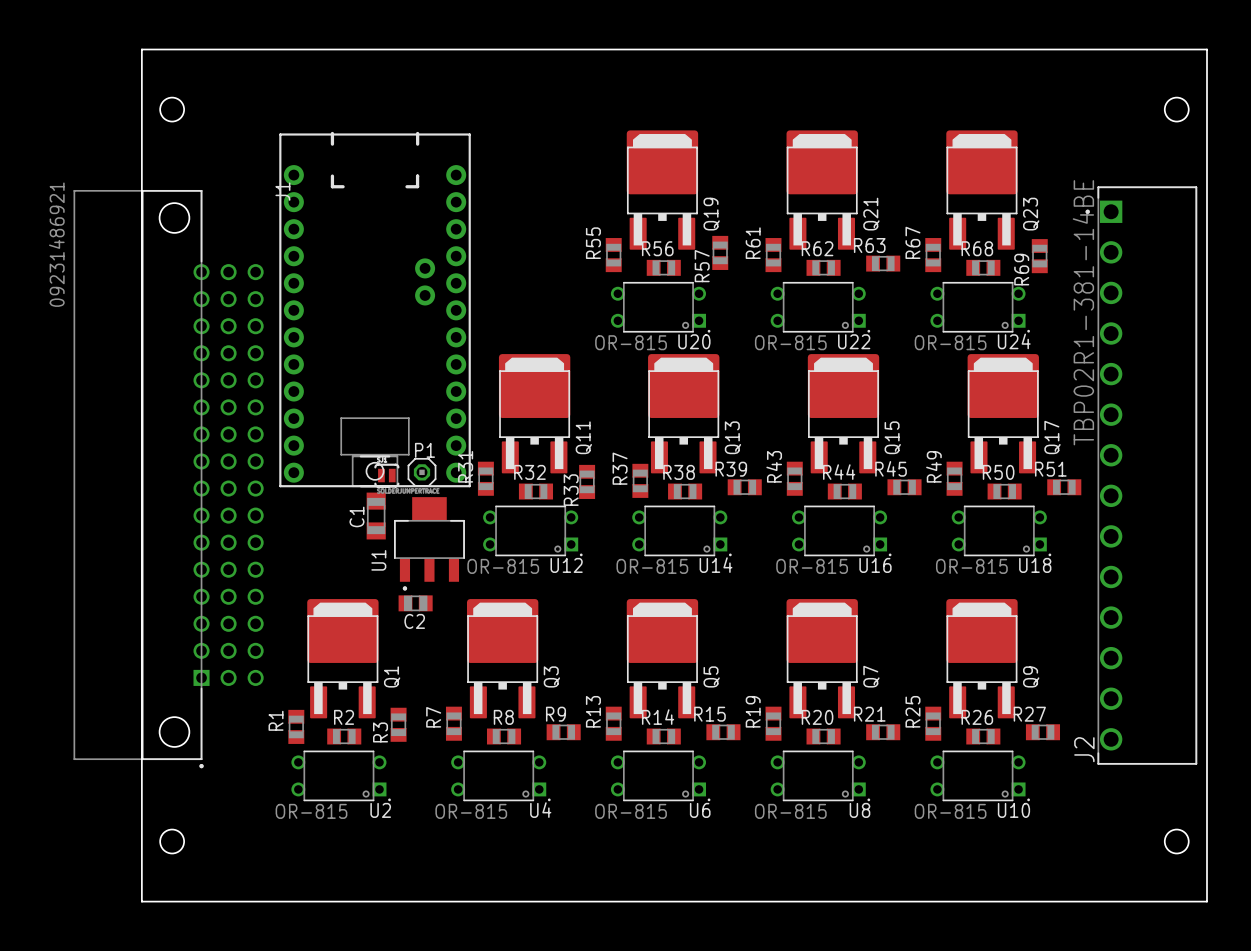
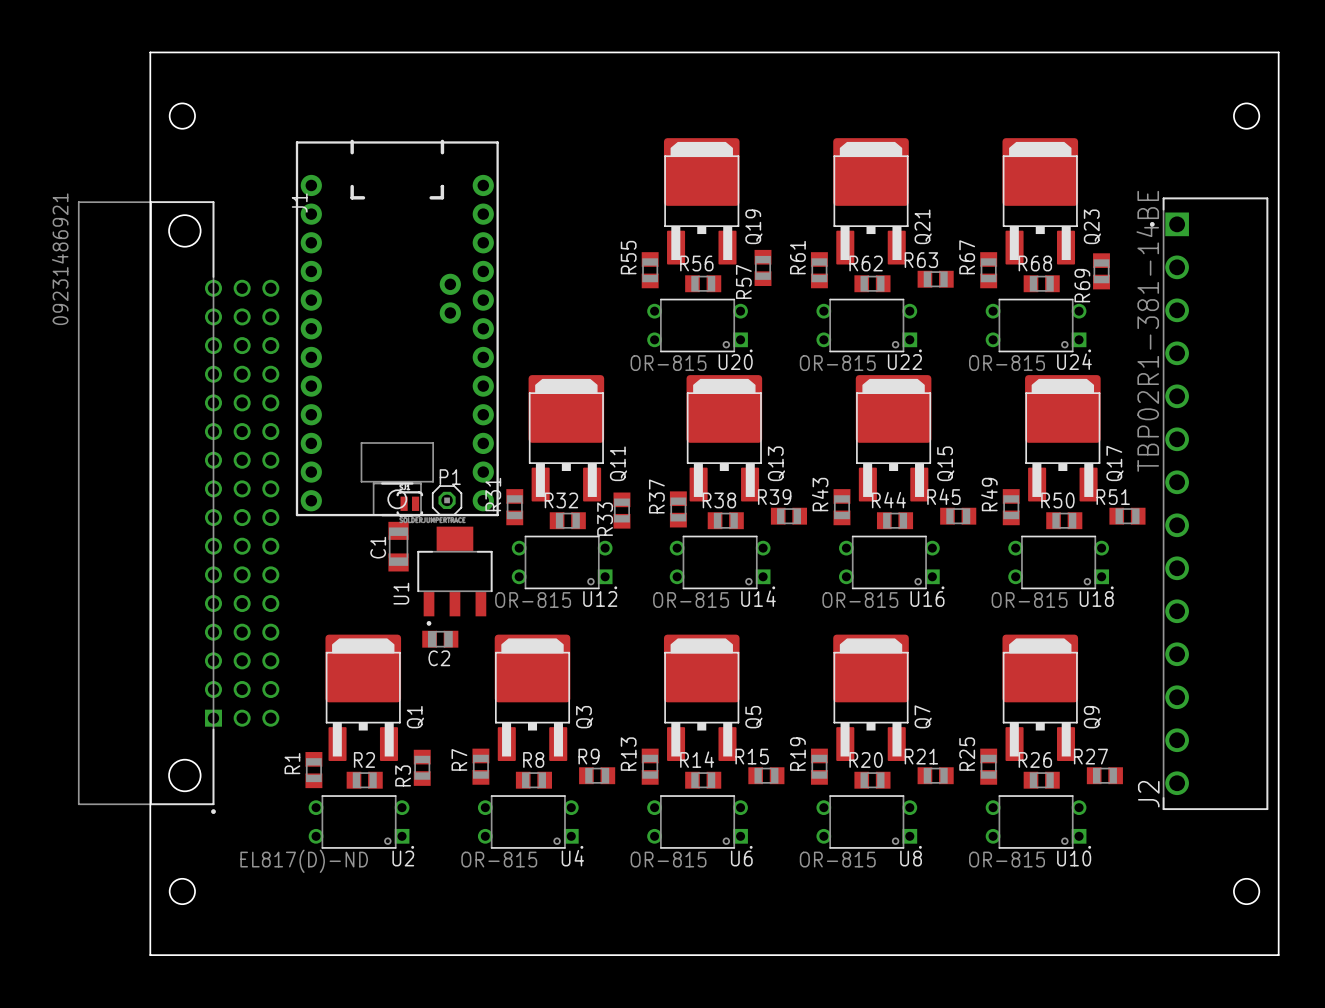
U2 value: OR-815 (311, 811) -> EL817(D)-ND (304, 861)

